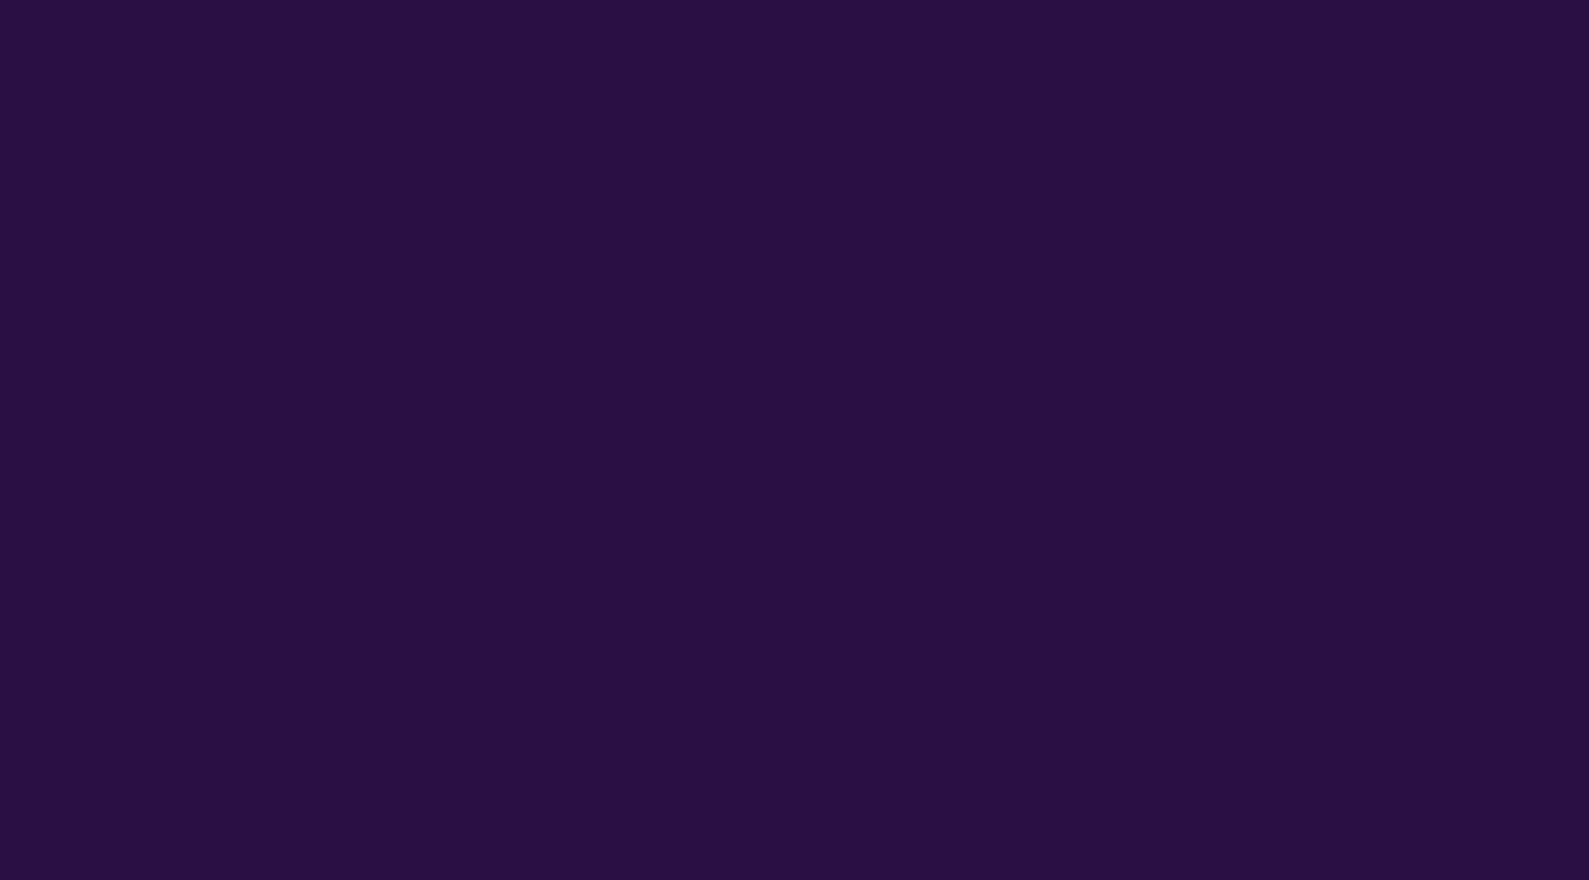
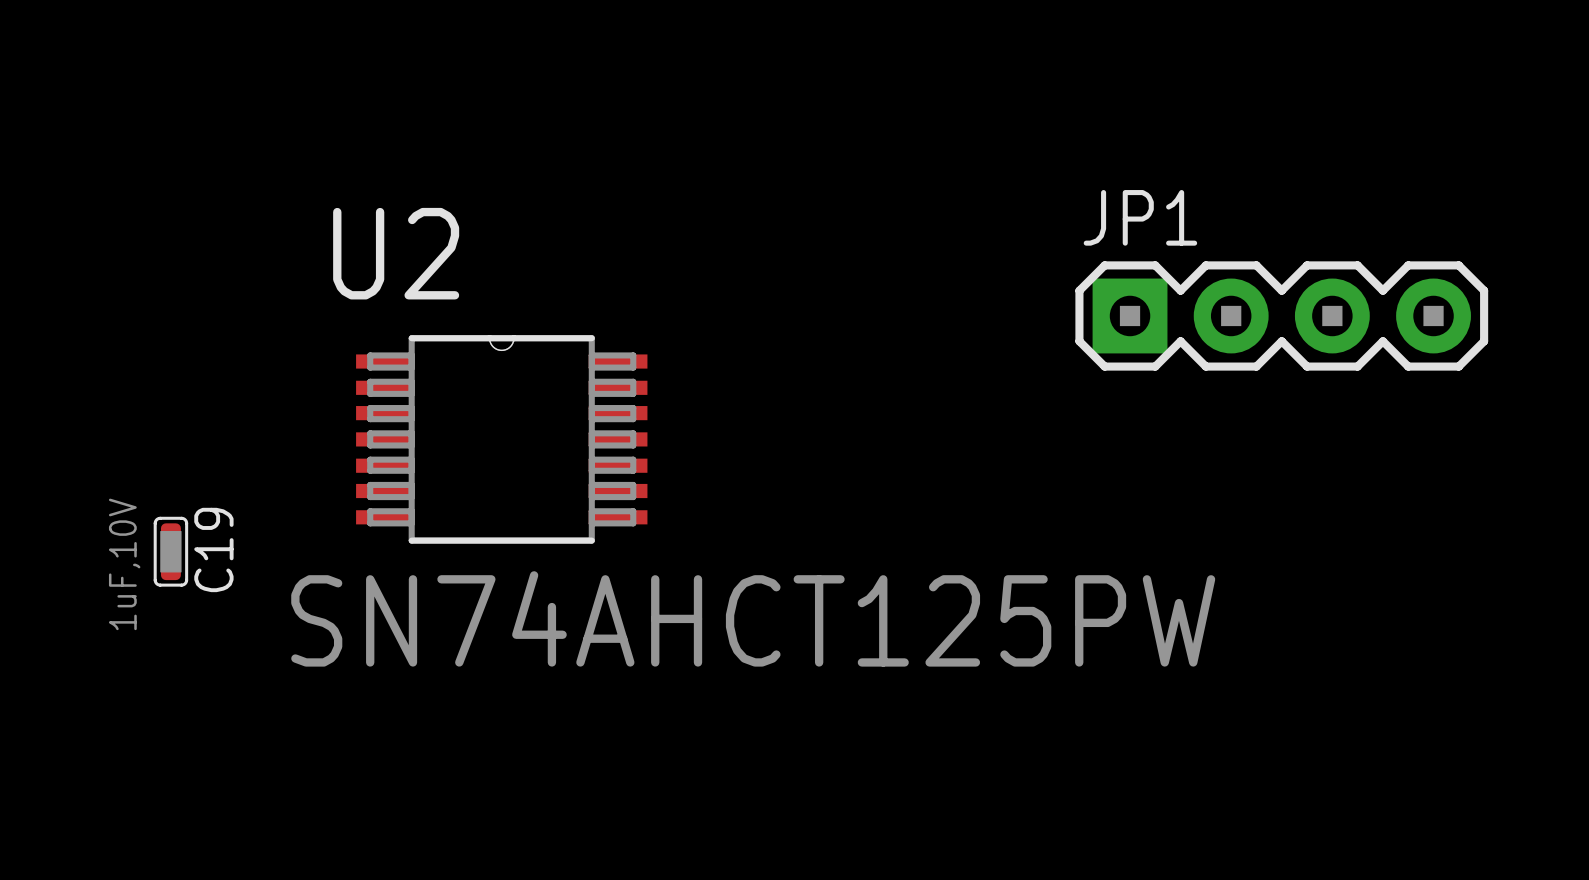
JP1: none -> (1281, 315)
U2: none -> SN74AHCT125PW (501, 439)
C19: none -> 1uF,10V (170, 551)

